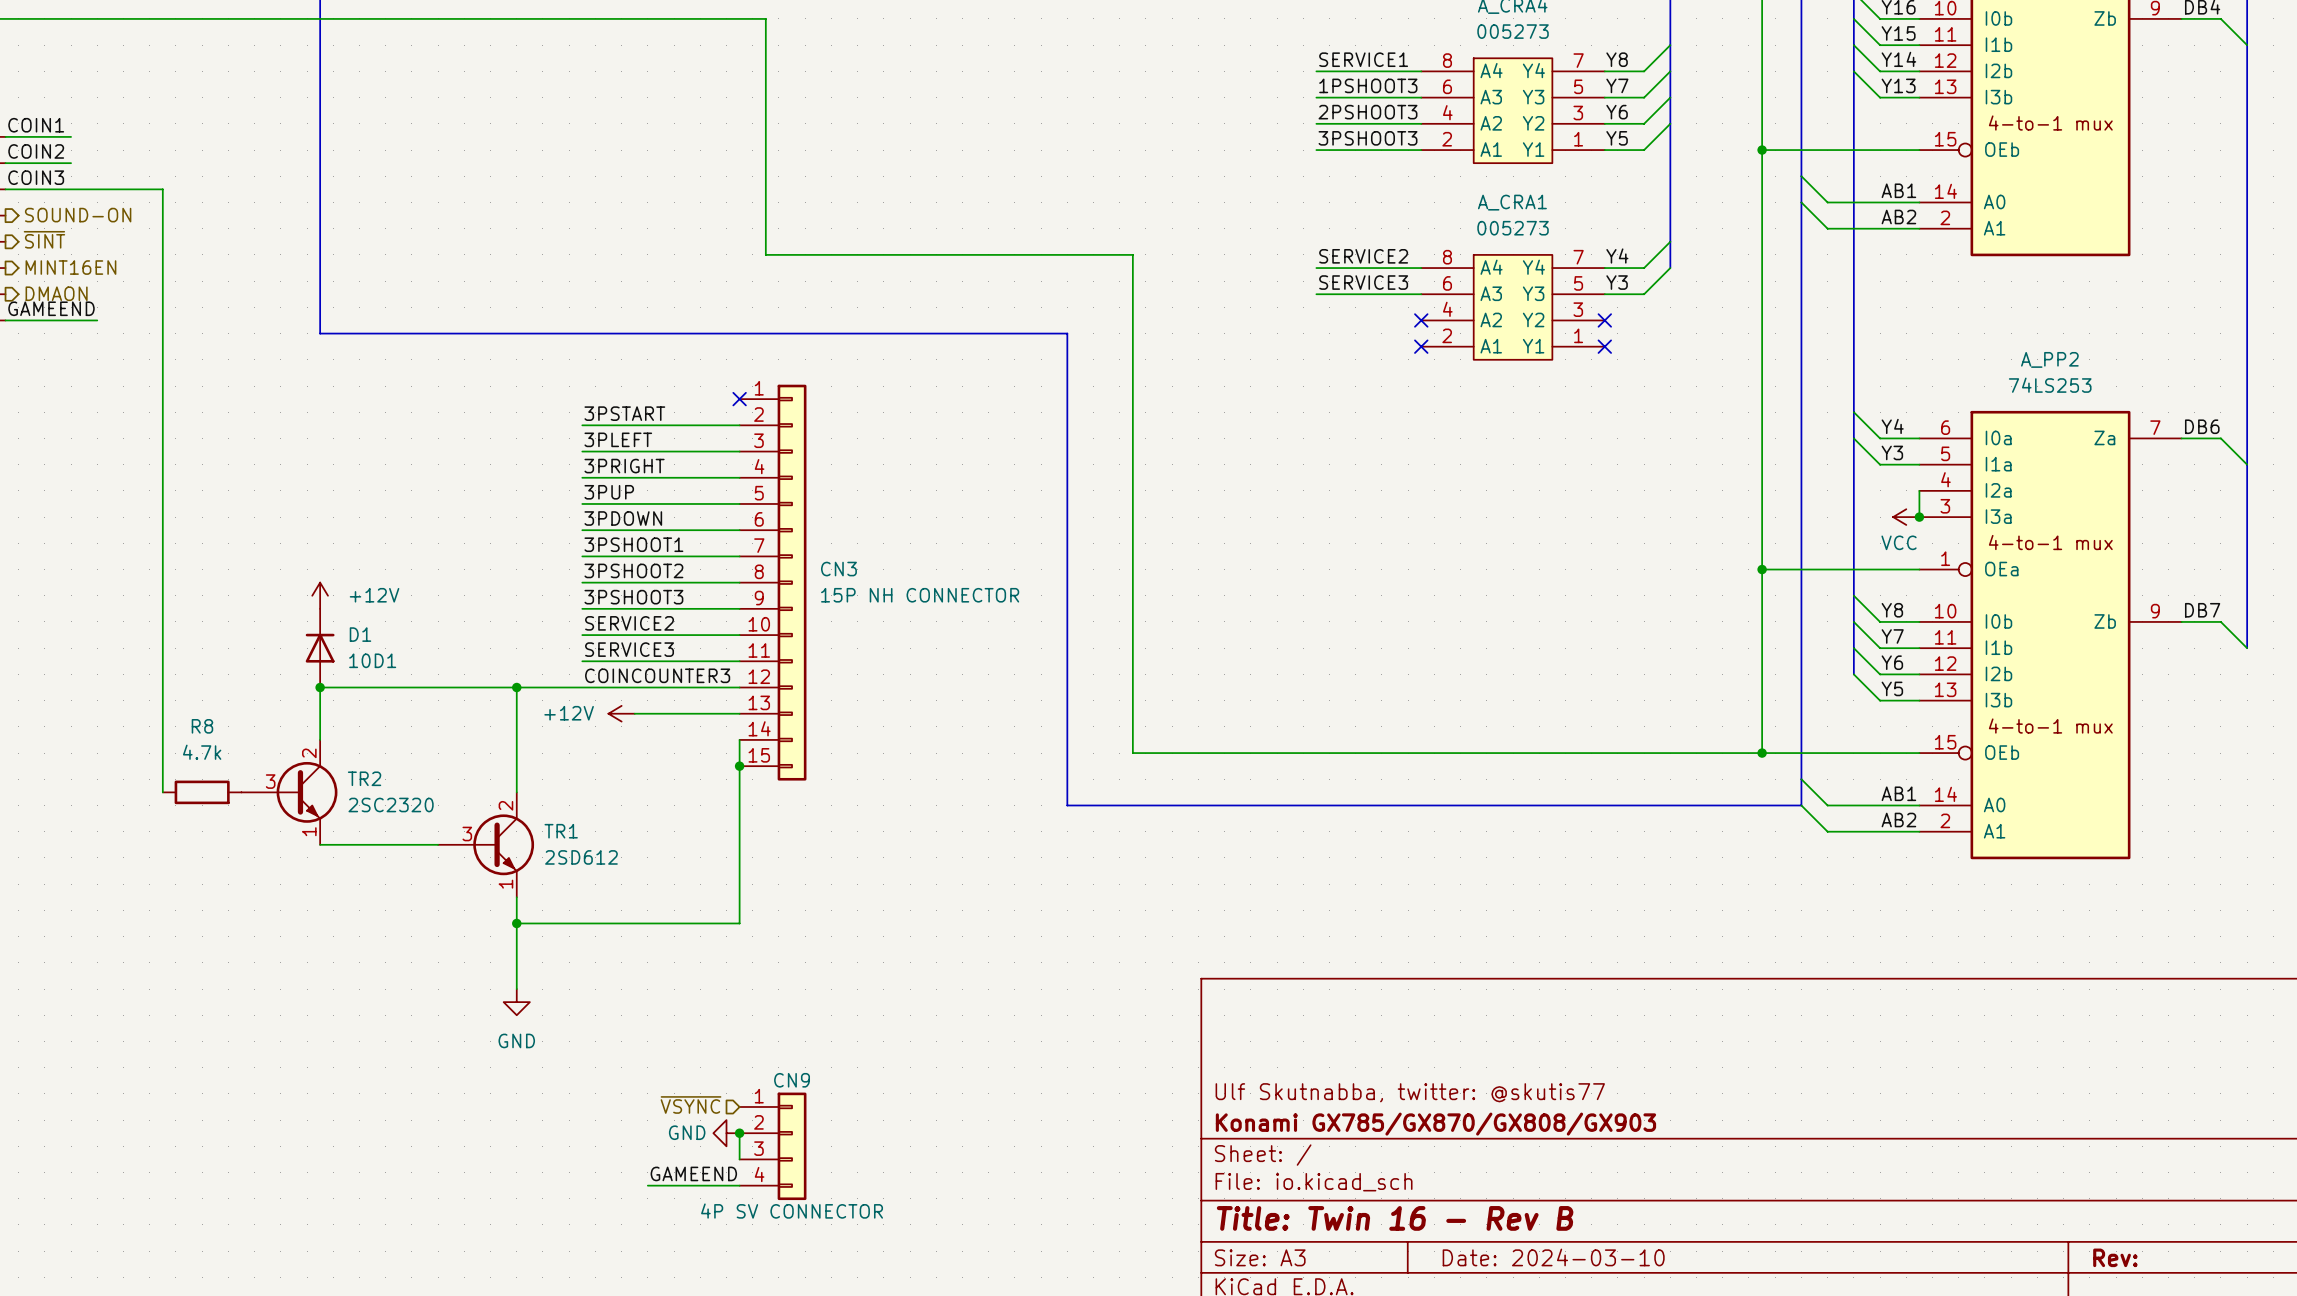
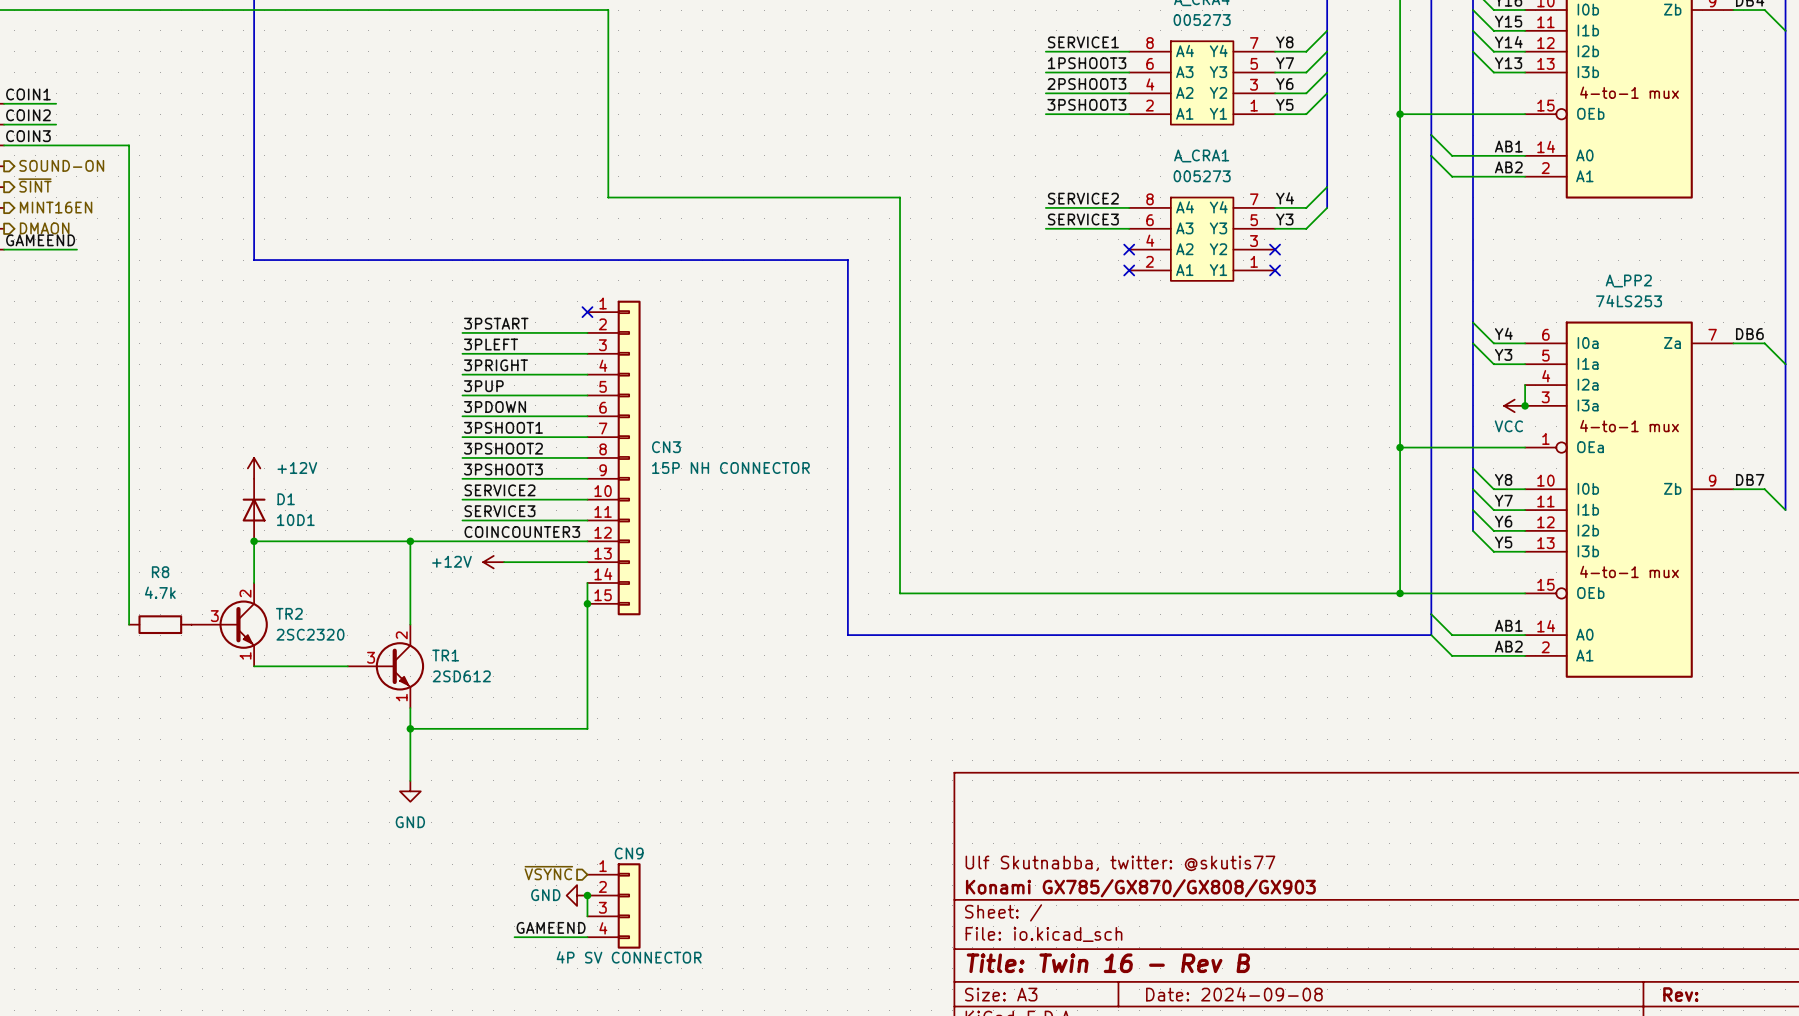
title block: Date: 2024-03-10 (1553, 1257) -> Date: 2024-09-08 (1234, 994)

